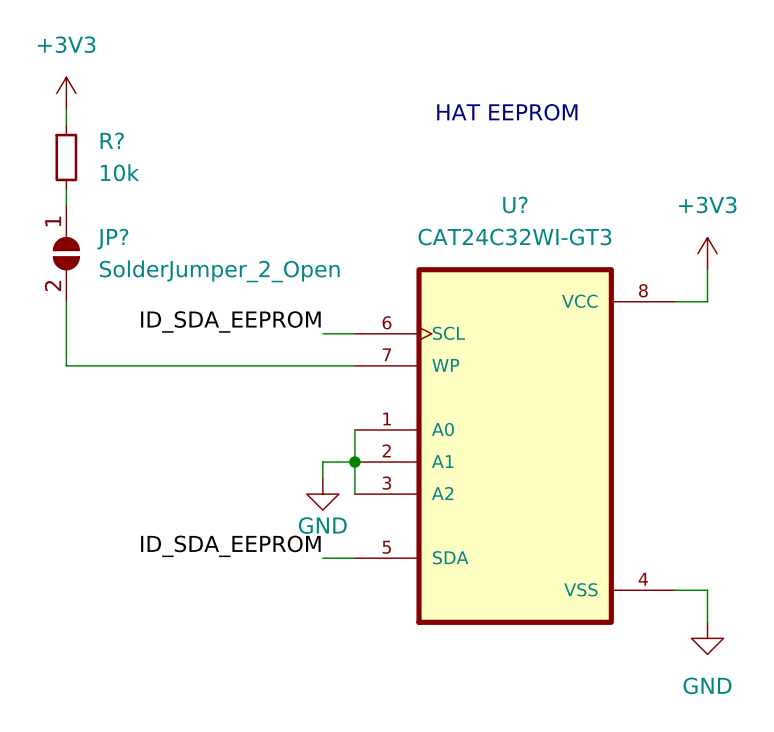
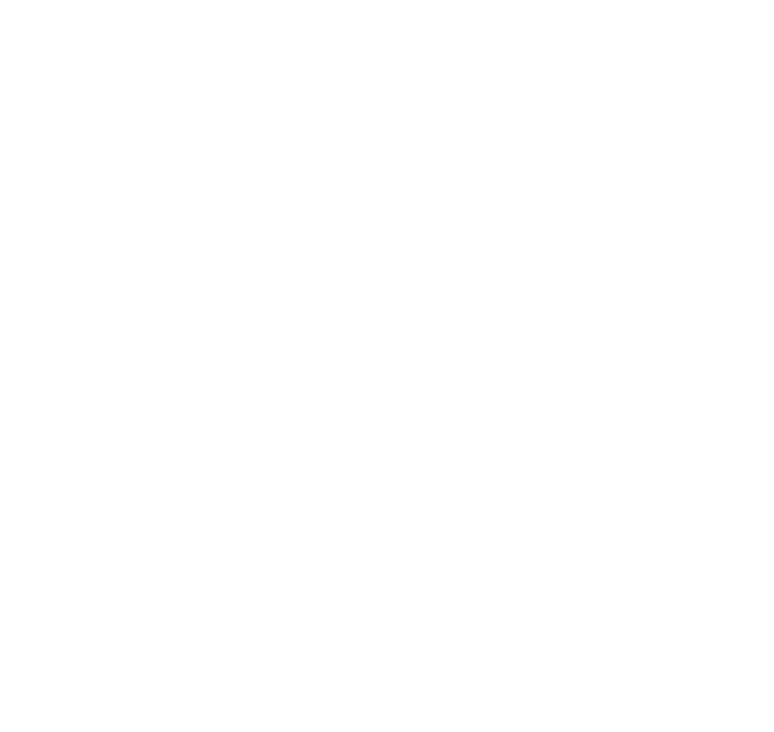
power symbol: +3V3 (66, 93) -> none
wire: (66, 109) (66, 125) -> none
text: HAT EEPROM (507, 112) -> none
R?: 10k (66, 157) -> none
wire: (66, 189) (66, 205) -> none
JP?: SolderJumper_2_Open (66, 253) -> none
power symbol: +3V3 (707, 253) -> none
wire: (707, 269) (707, 301) (675, 301) -> none
wire: (66, 301) (66, 365) (354, 365) -> none
label: ID_SDA_EEPROM (230, 321) -> none
wire: (322, 333) (354, 333) -> none
wire: (354, 429) (354, 494) -> none
U?: CAT24C32WI-GT3 (515, 446) -> none
wire: (354, 462) (322, 462) (322, 478) -> none
junction: (354, 462) -> none
power symbol: GND (322, 494) -> none
label: ID_SDA_EEPROM (230, 546) -> none
wire: (322, 558) (354, 558) -> none
wire: (675, 590) (707, 590) (707, 622) -> none
power symbol: GND (707, 638) -> none

